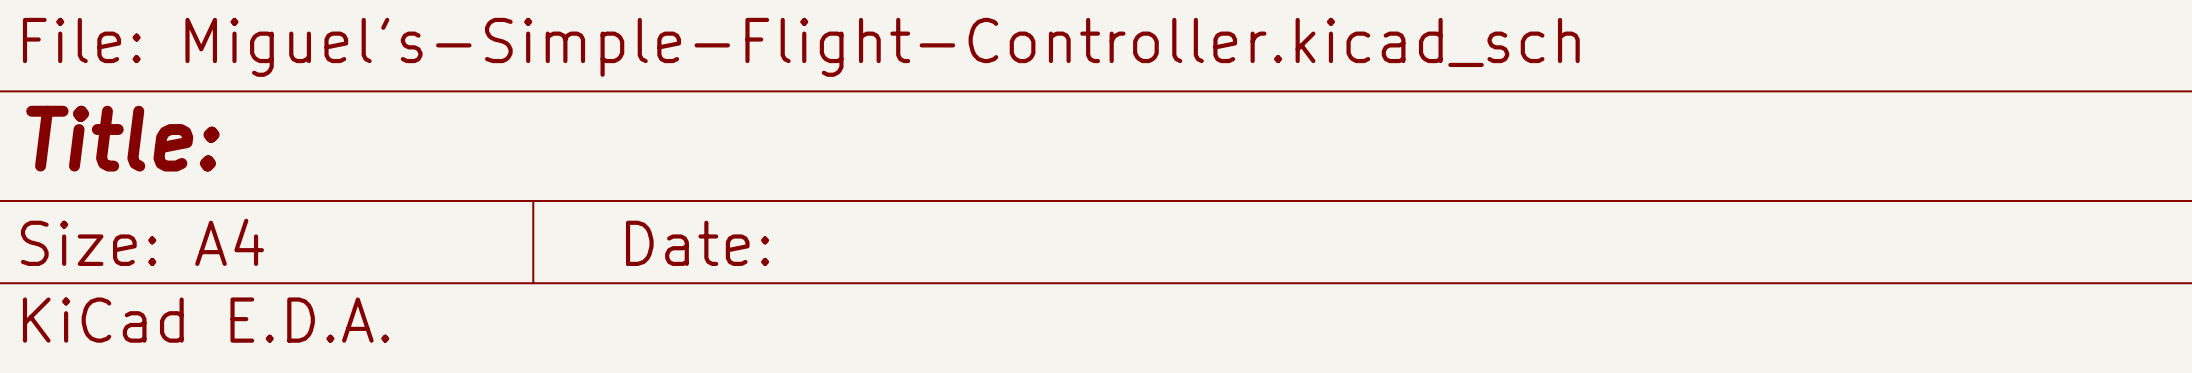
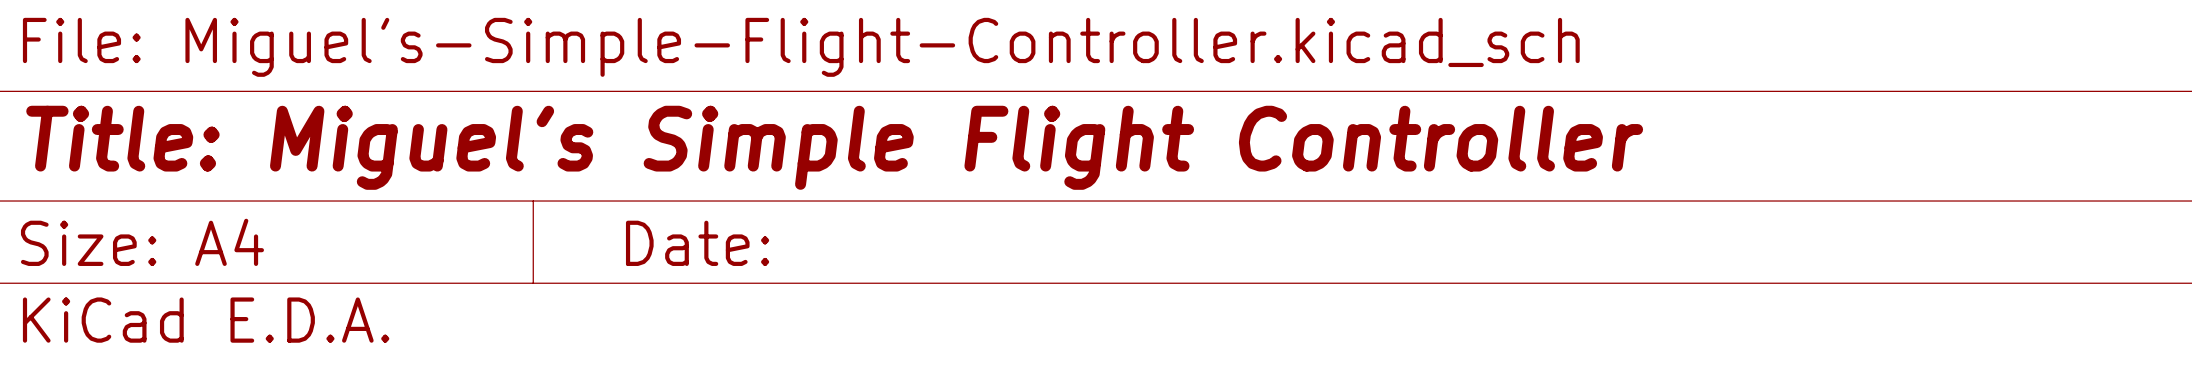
title block: Title: (122, 138) -> Title: Miguel's Simple Flight Controller (834, 147)

